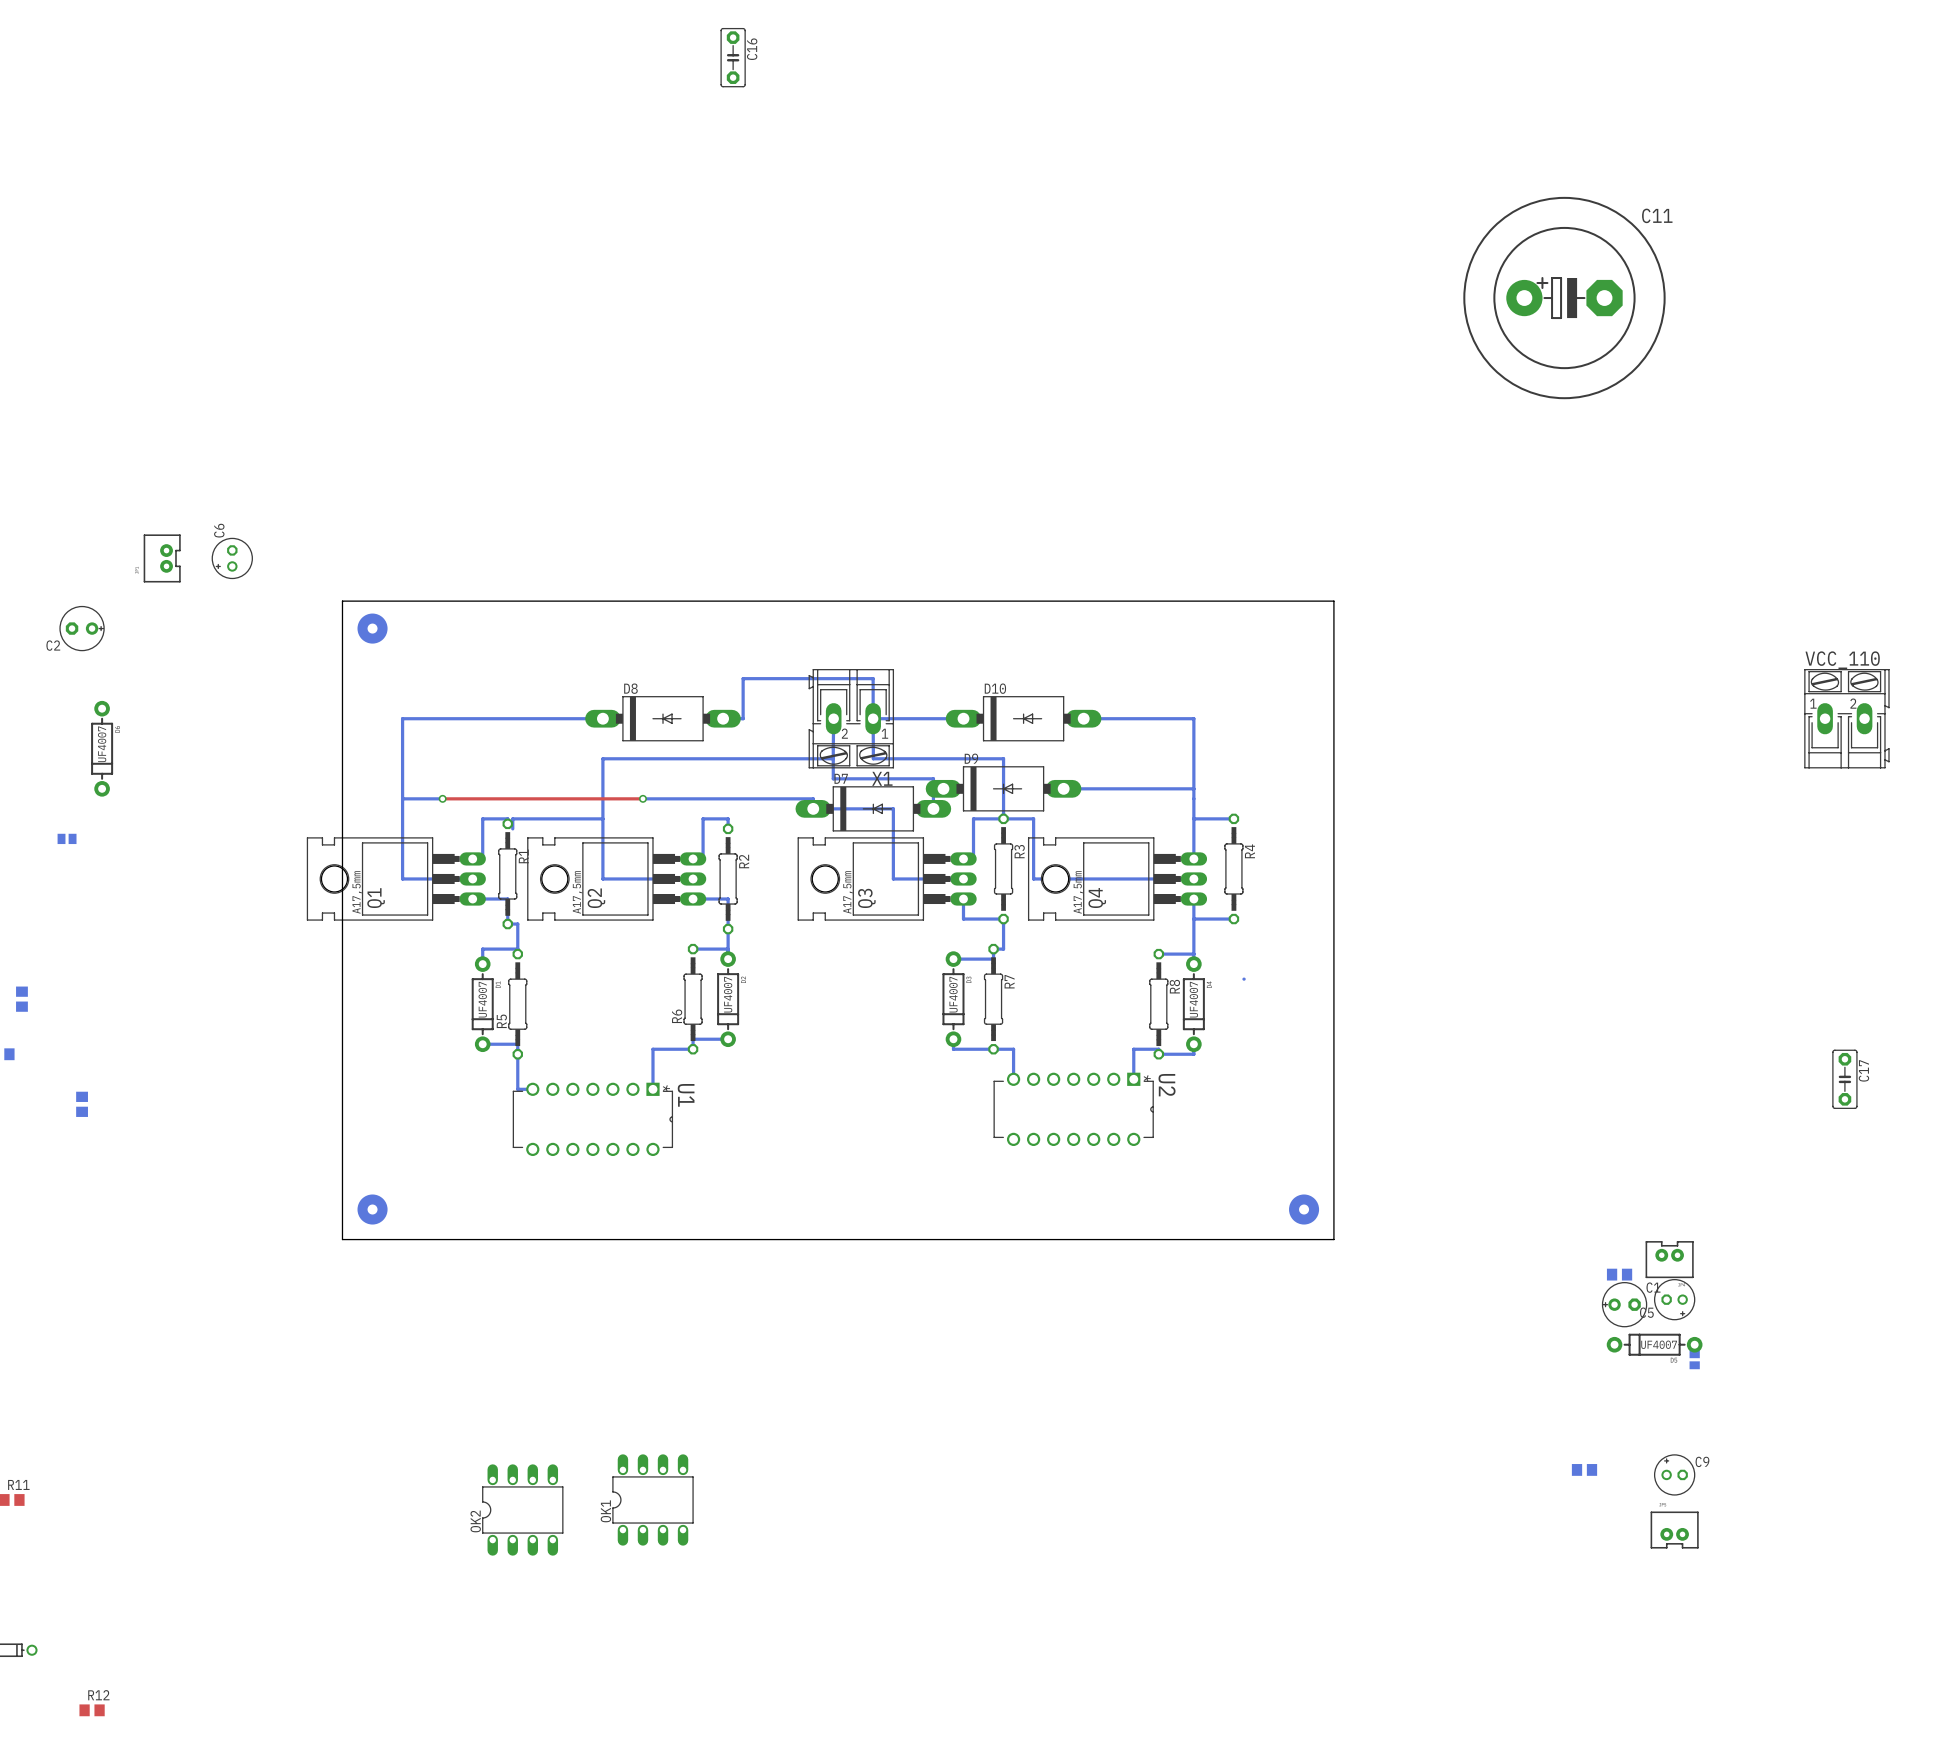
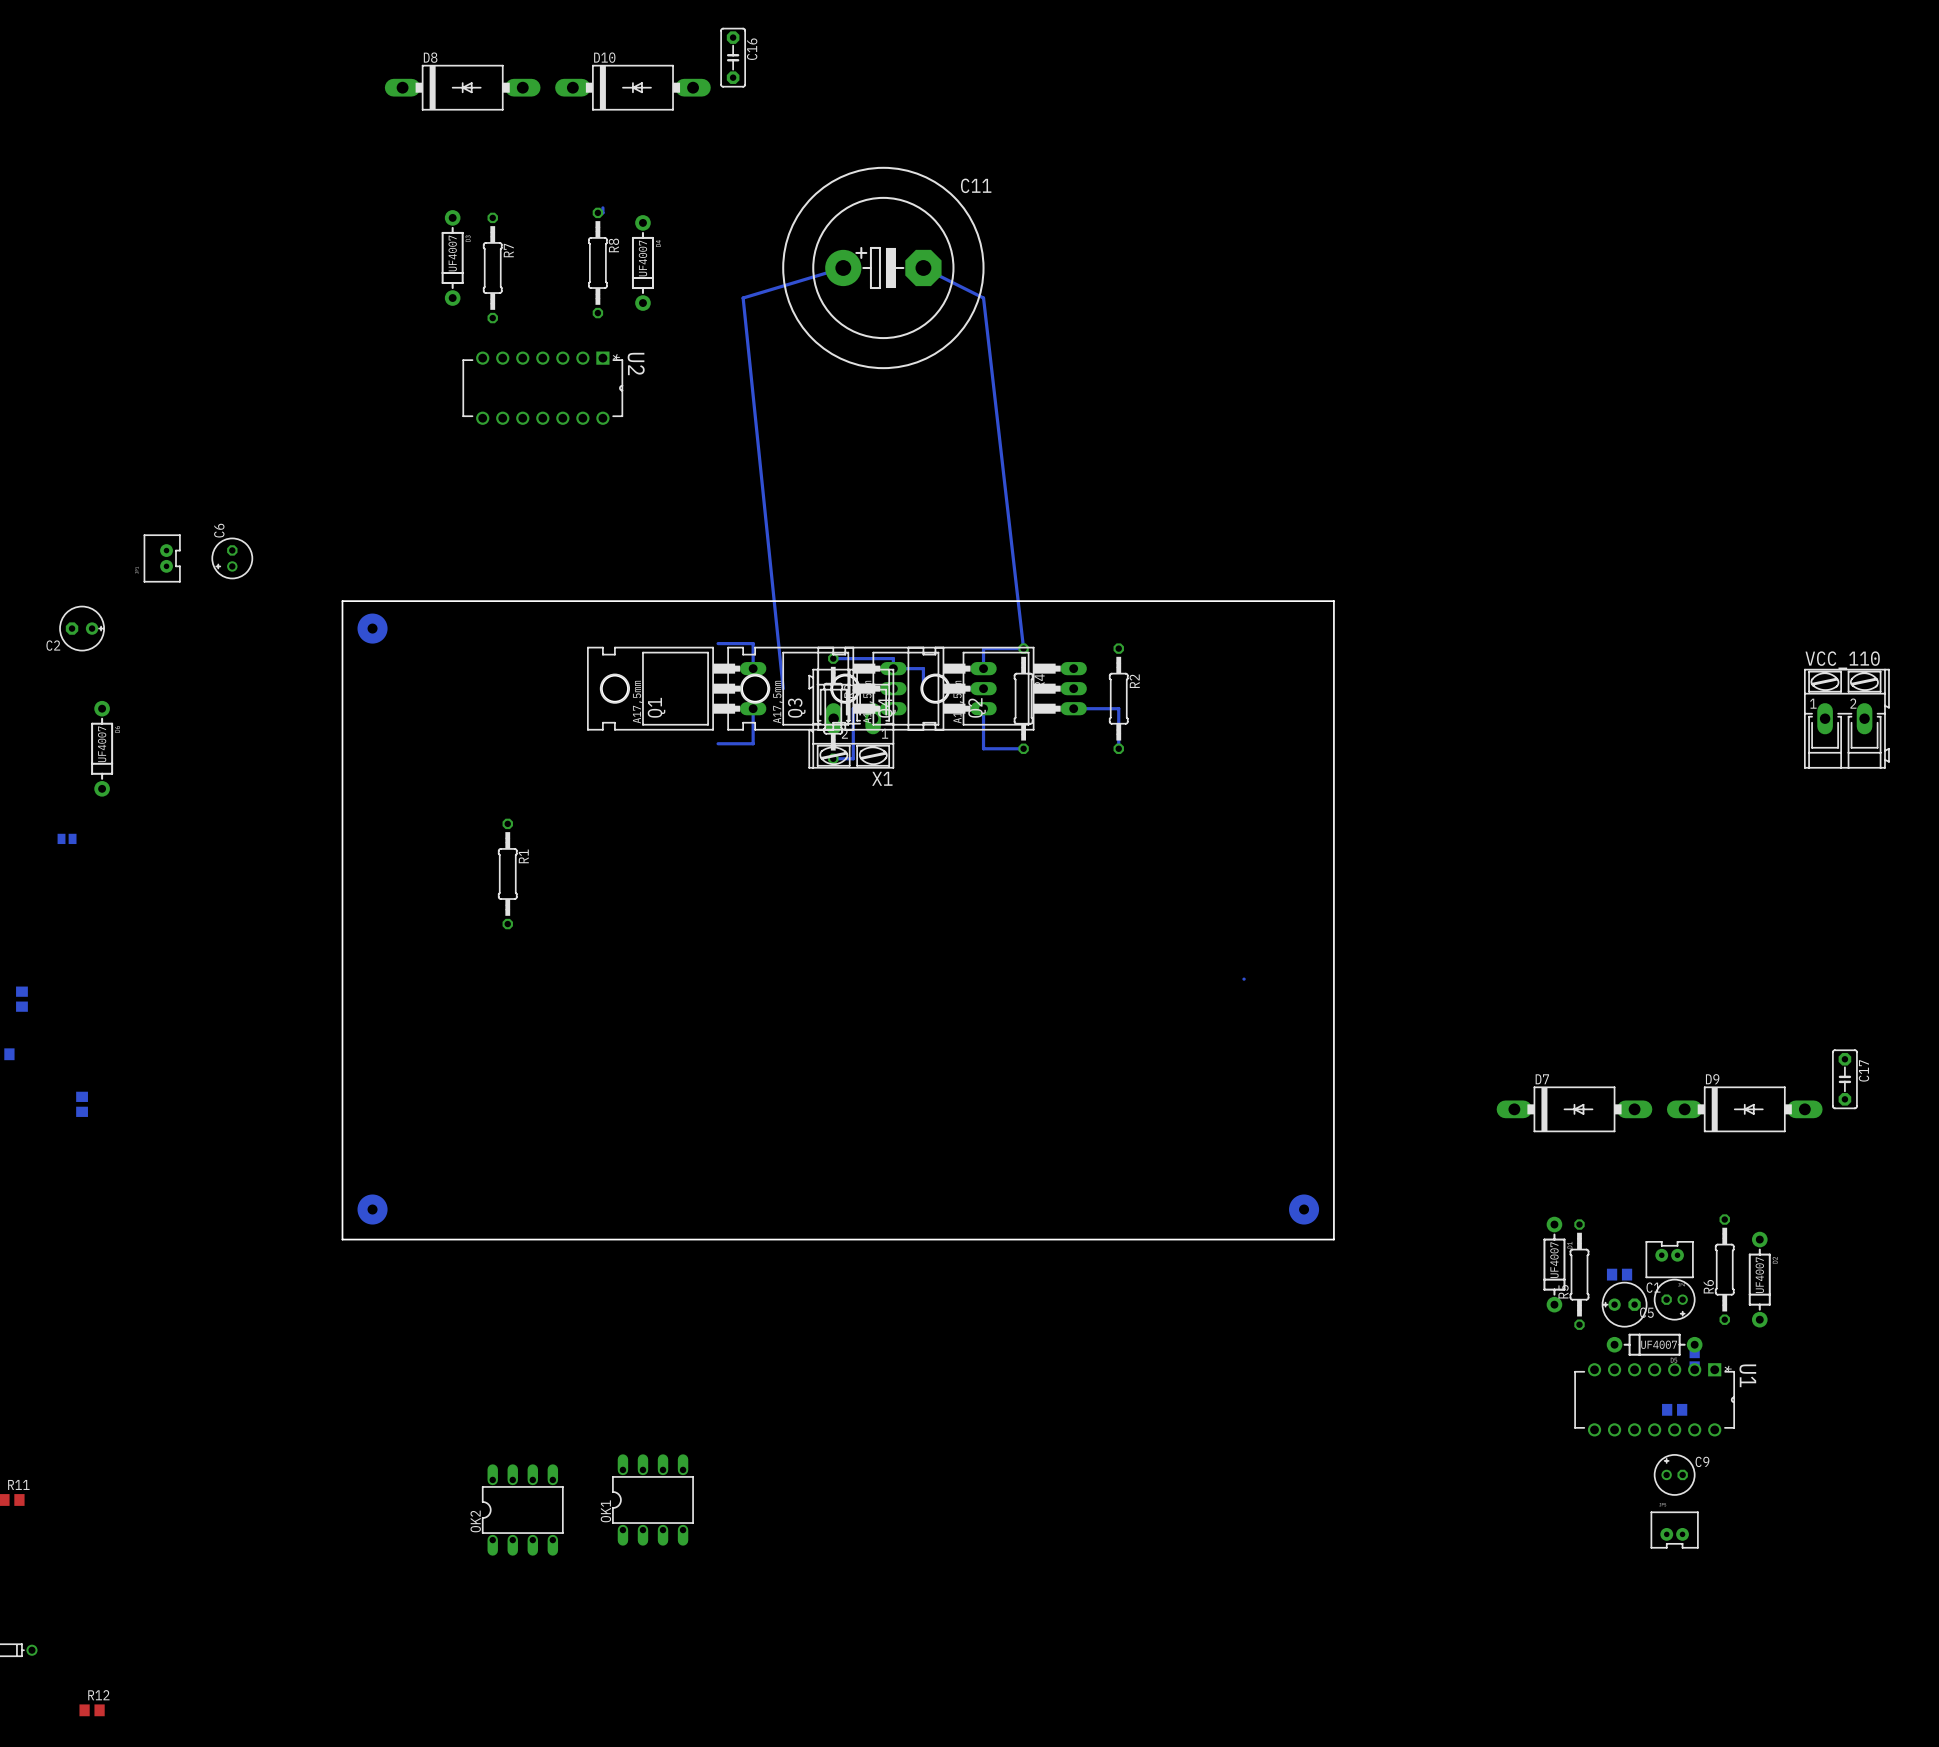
bottom track: none -> (602, 207) (602, 212) (597, 212)
bottom track: none -> (843, 267) (743, 298) (783, 688)
bottom track: none -> (923, 267) (983, 298) (1023, 648) (983, 648) (983, 668)
C11 position: (1564, 298) -> (883, 267)
bottom track: none -> (718, 643) (753, 643) (753, 668)
bottom track: none -> (833, 658) (893, 658) (893, 668) (923, 668) (923, 688) (983, 688)
bottom track: none -> (753, 708) (753, 743) (718, 743)
bottom track: none -> (983, 708) (983, 748) (1023, 748)
bottom track: none -> (1073, 708) (1118, 708) (1118, 748)
bottom track: (602, 718) (402, 718) (402, 878) (472, 878) -> none
D8 position: (663, 718) -> (462, 87)
bottom track: (723, 718) (743, 718) (743, 678) (873, 678) (873, 718) -> none
bottom track: (833, 718) (833, 778) (933, 778) (933, 808) -> none
bottom track: (873, 718) (873, 758) (1003, 758) (1003, 818) -> none
bottom track: (873, 718) (963, 718) -> none
D10 position: (1023, 718) -> (632, 87)
bottom track: (1083, 718) (1193, 718) (1193, 858) -> none
bottom track: (833, 758) (602, 758) (602, 878) (693, 878) -> (833, 758) (853, 758) (853, 708) (893, 708)
D9 position: (1003, 788) -> (1744, 1109)
bottom track: (1063, 788) (1193, 788) -> none
bottom track: (402, 798) (442, 798) -> none
top track: (442, 798) (642, 798) -> none
via: (442, 798) -> none
bottom track: (642, 798) (813, 798) (813, 808) (893, 808) (893, 878) (963, 878) -> none
via: (642, 798) -> none
D7 position: (873, 808) -> (1574, 1109)
bottom track: (602, 818) (512, 818) (512, 828) -> none
bottom track: (1193, 818) (1233, 818) -> none
bottom track: (507, 823) (507, 818) (482, 818) (482, 858) (472, 858) -> none
bottom track: (728, 828) (728, 818) (703, 818) (703, 858) (693, 858) -> none
bottom track: (963, 858) (973, 858) (973, 818) (1033, 818) (1033, 878) (1193, 878) -> none
R3 position: (1003, 868) -> (833, 708)
R4 position: (1233, 868) -> (1023, 698)
Q1 position: (396, 878) -> (676, 688)
Q2 position: (616, 878) -> (997, 688)
R2 position: (728, 878) -> (1118, 698)
Q3 position: (887, 878) -> (817, 688)
Q4 position: (1117, 878) -> (907, 688)
bottom track: (472, 899) (507, 899) (507, 924) (517, 924) (517, 954) -> none
bottom track: (693, 899) (728, 899) (728, 959) -> none
bottom track: (963, 899) (963, 919) (1003, 919) (1003, 949) (993, 949) (993, 959) (953, 959) -> none
bottom track: (1193, 899) (1193, 964) -> none
bottom track: (1193, 919) (1233, 919) -> none
bottom track: (517, 949) (482, 949) (482, 964) -> none
bottom track: (693, 949) (728, 949) -> none
bottom track: (1158, 954) (1193, 954) -> none
R6 position: (693, 999) -> (1724, 1269)
part position: (728, 999) -> (1759, 1279)
part position: (953, 999) -> (452, 257)
R7 position: (993, 999) -> (492, 267)
part position: (482, 1004) -> (1554, 1264)
R5 position: (517, 1004) -> (1579, 1274)
R8 position: (1158, 1004) -> (597, 262)
part position: (1193, 1004) -> (642, 262)
bottom track: (728, 1039) (693, 1039) (693, 1049) (652, 1049) (652, 1089) -> none
bottom track: (953, 1039) (953, 1049) (1013, 1049) (1013, 1079) -> none
bottom track: (482, 1044) (517, 1044) (517, 1089) (532, 1089) -> none
bottom track: (1193, 1044) (1193, 1054) (1158, 1054) (1158, 1049) (1133, 1049) (1133, 1079) -> none
U2 position: (1073, 1109) -> (542, 388)
U1 position: (592, 1119) -> (1654, 1399)
part position: (1584, 1469) -> (1674, 1409)

